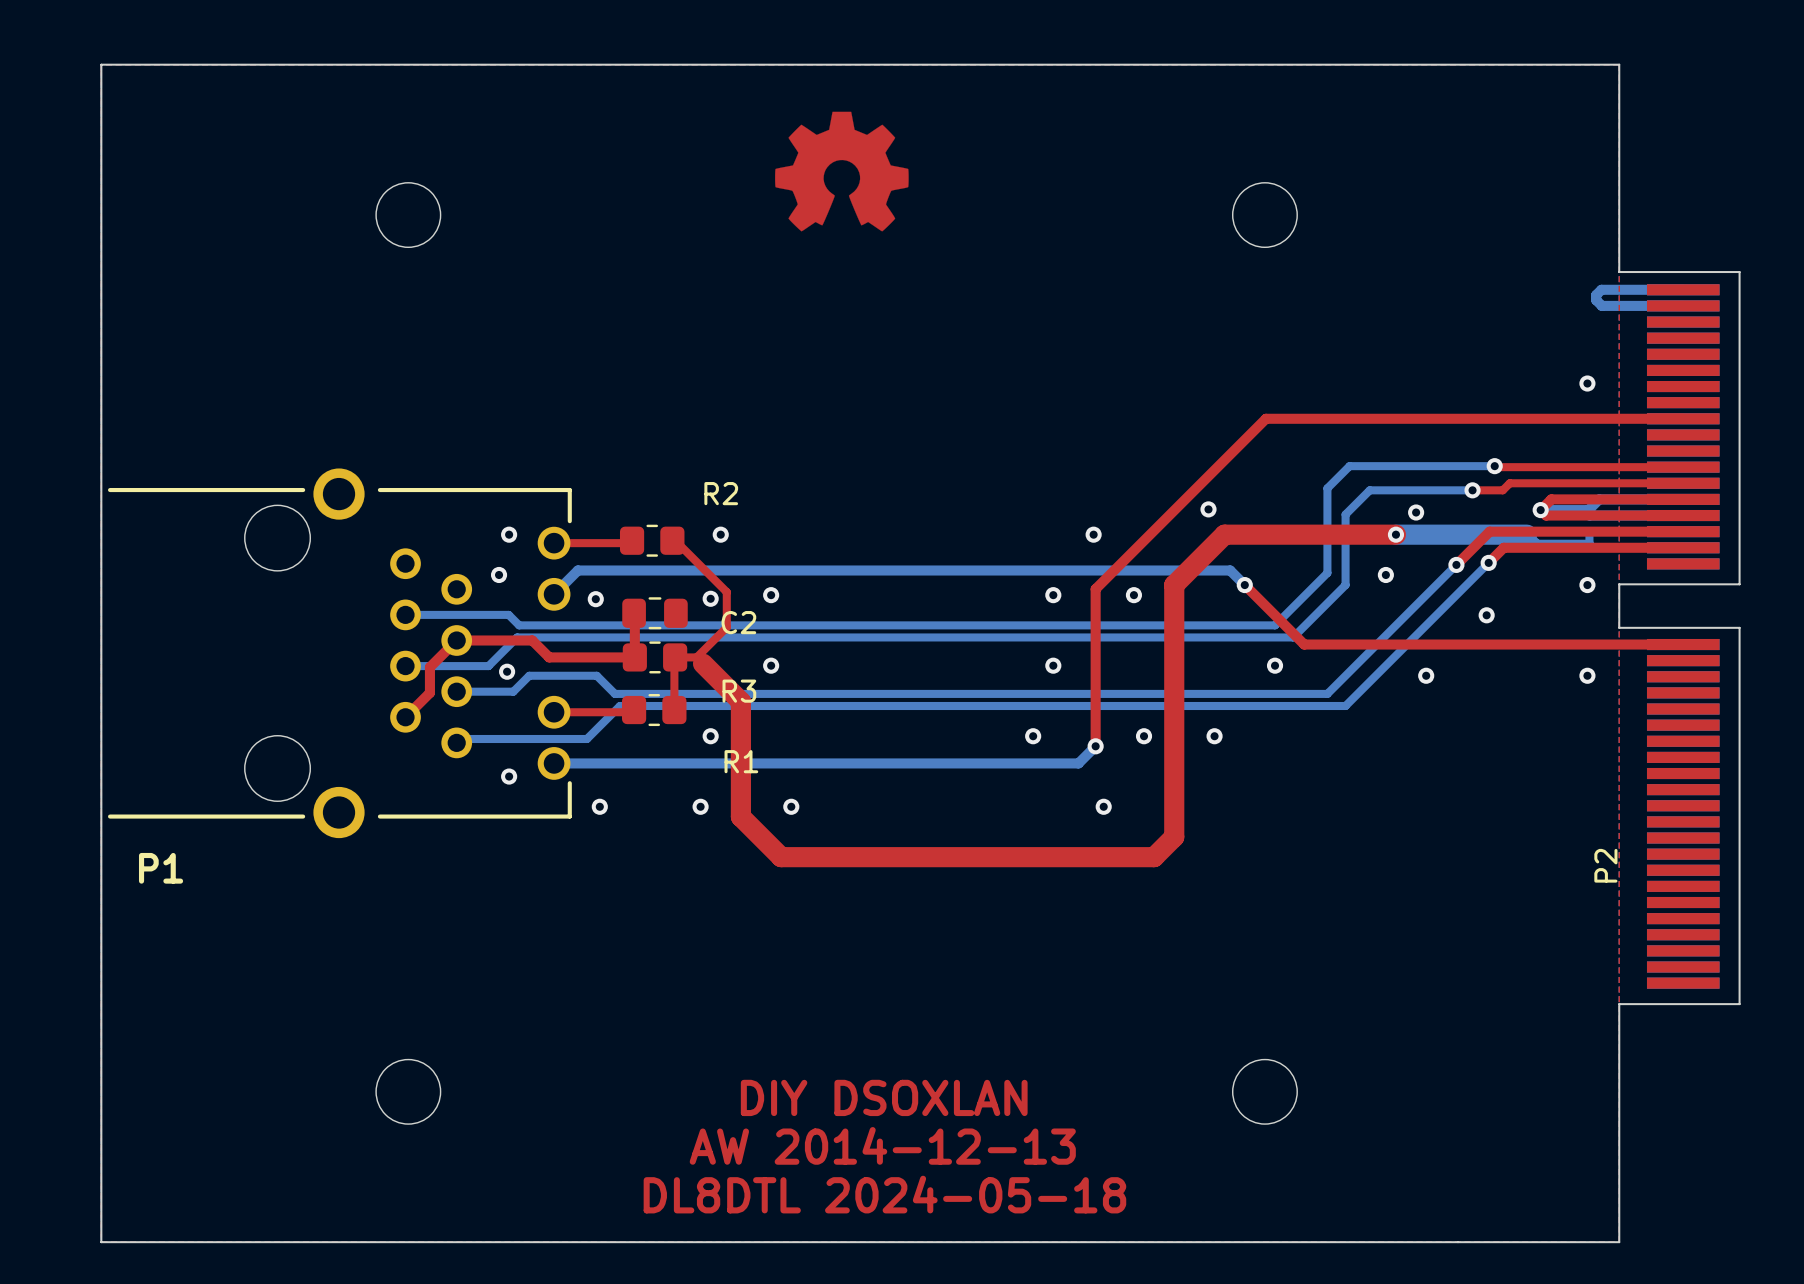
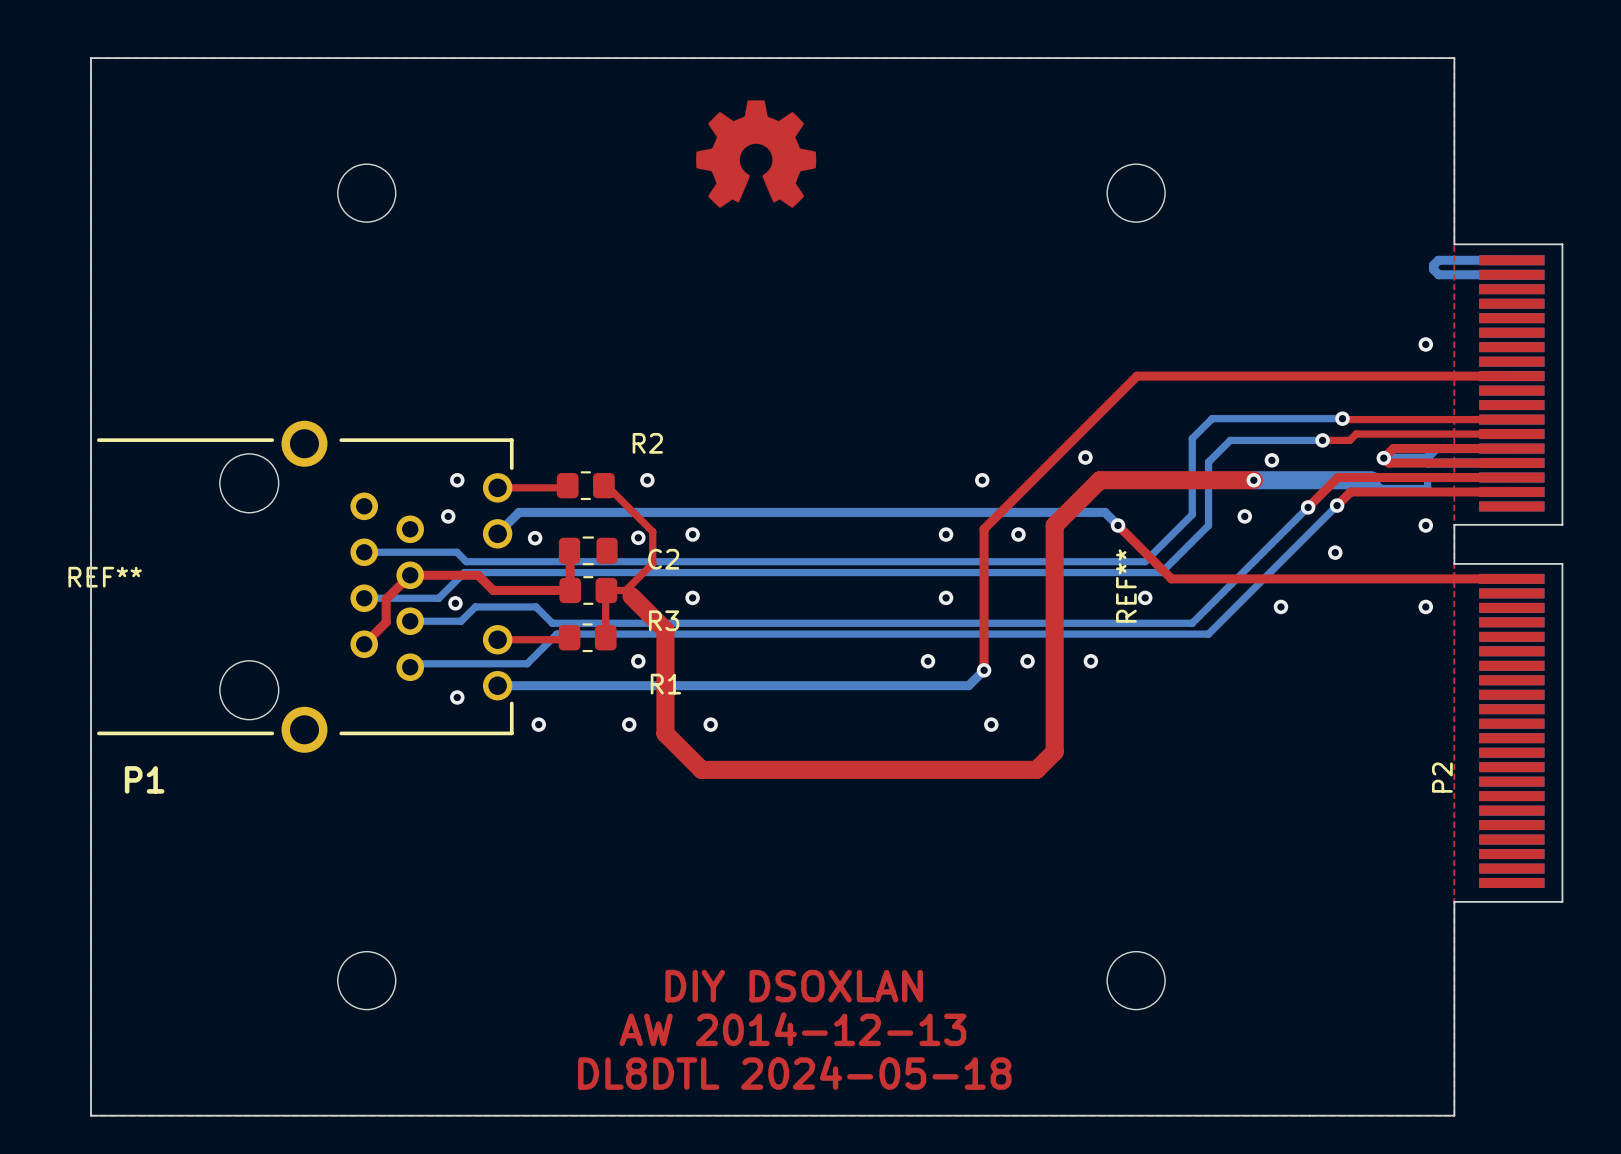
REF**: none -> (105, 577)
REF**: none -> (1126, 586)

